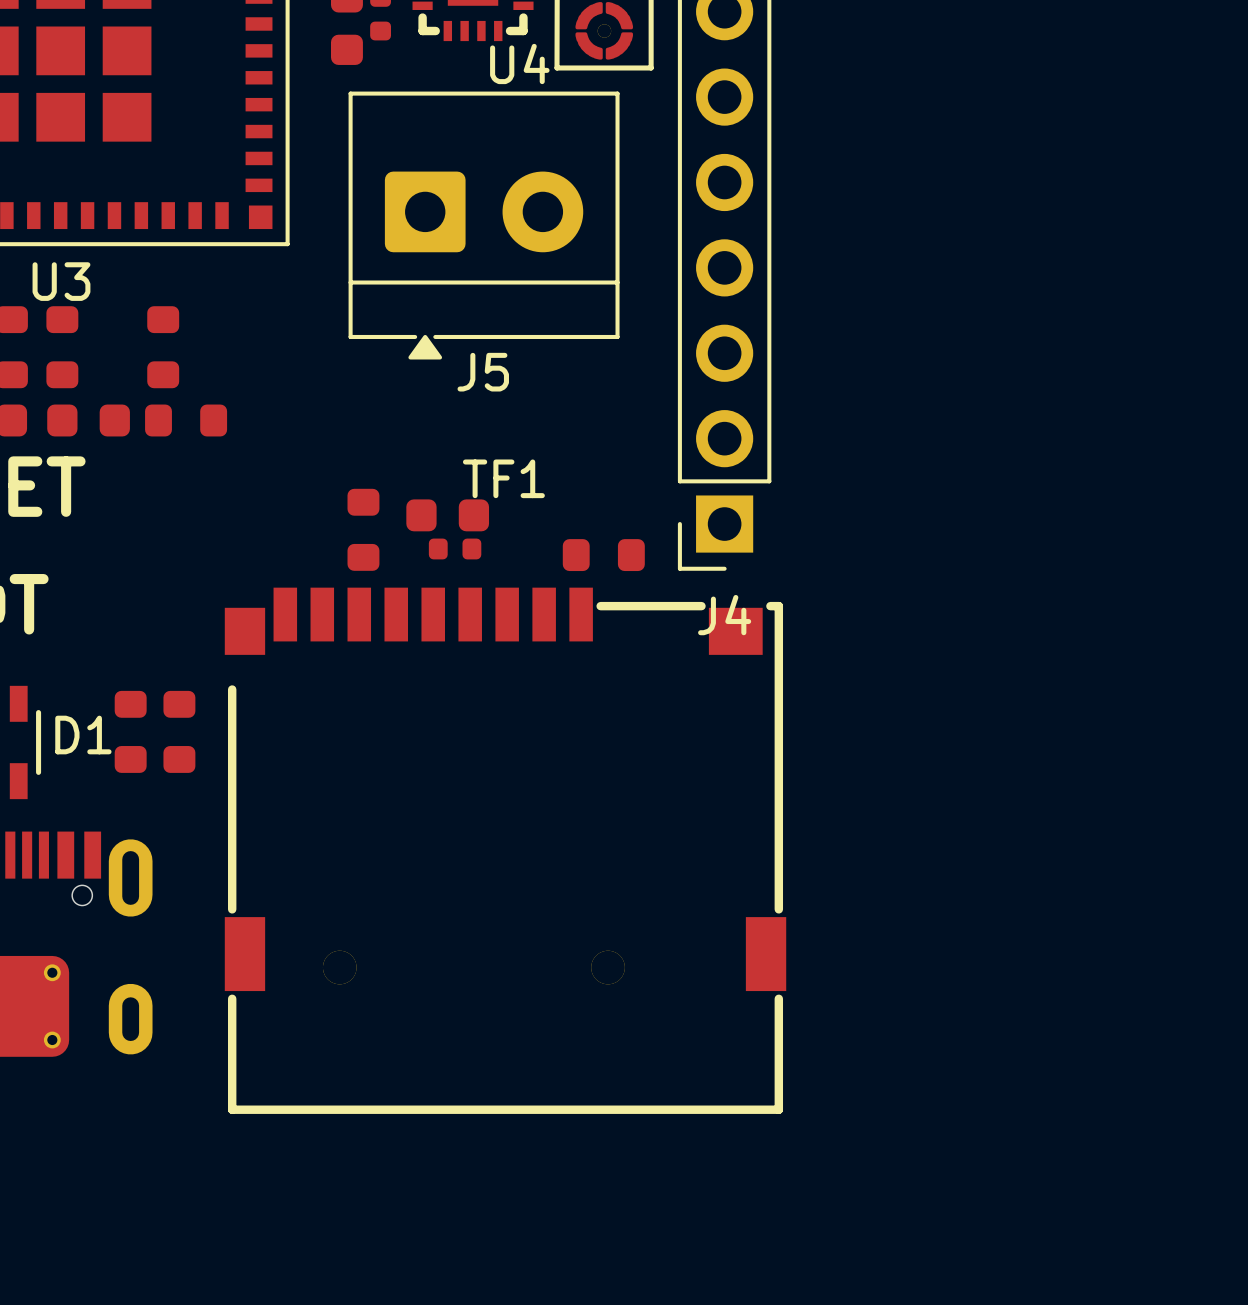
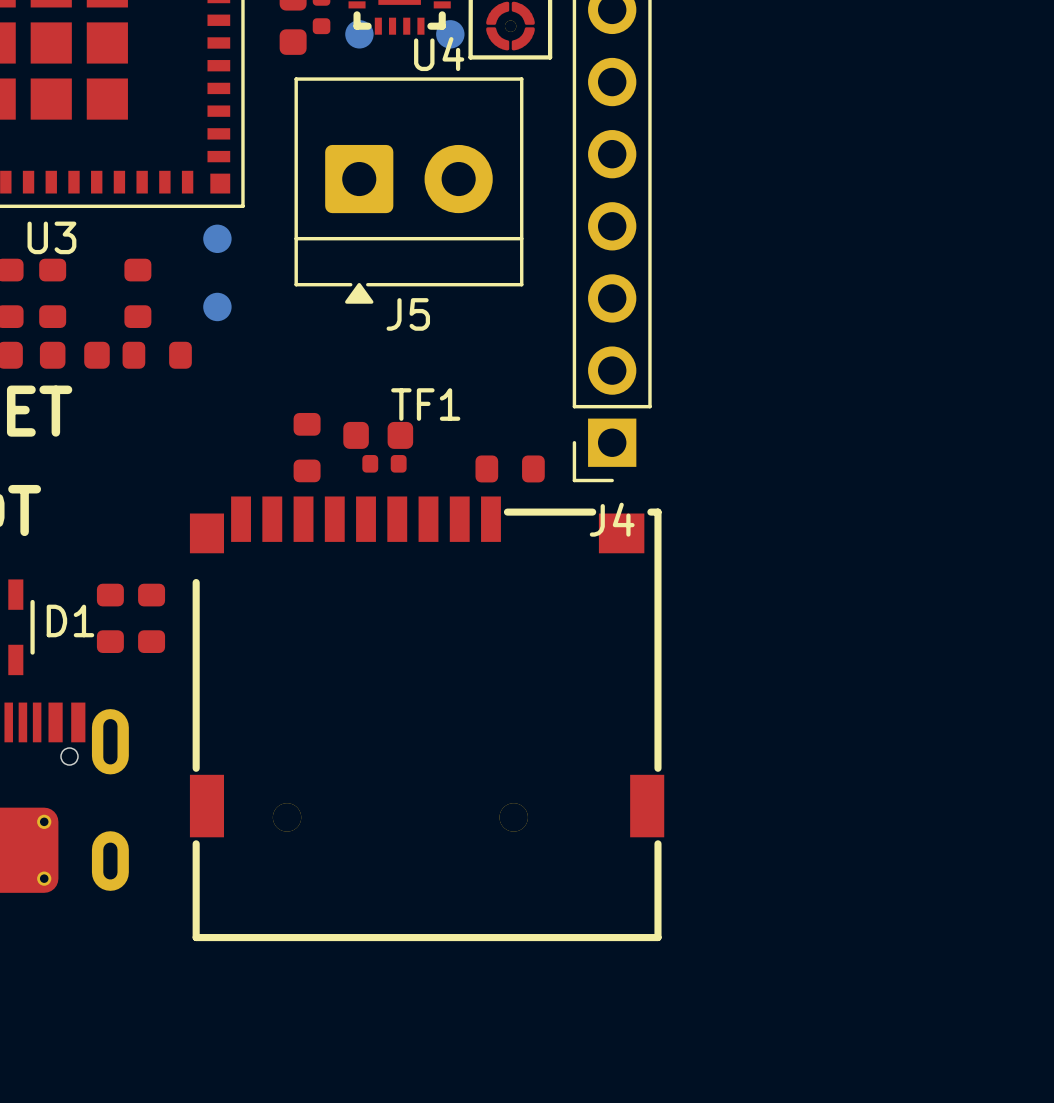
part: none -> (359, 34)
part: none -> (450, 34)
part: none -> (217, 238)
part: none -> (217, 306)

